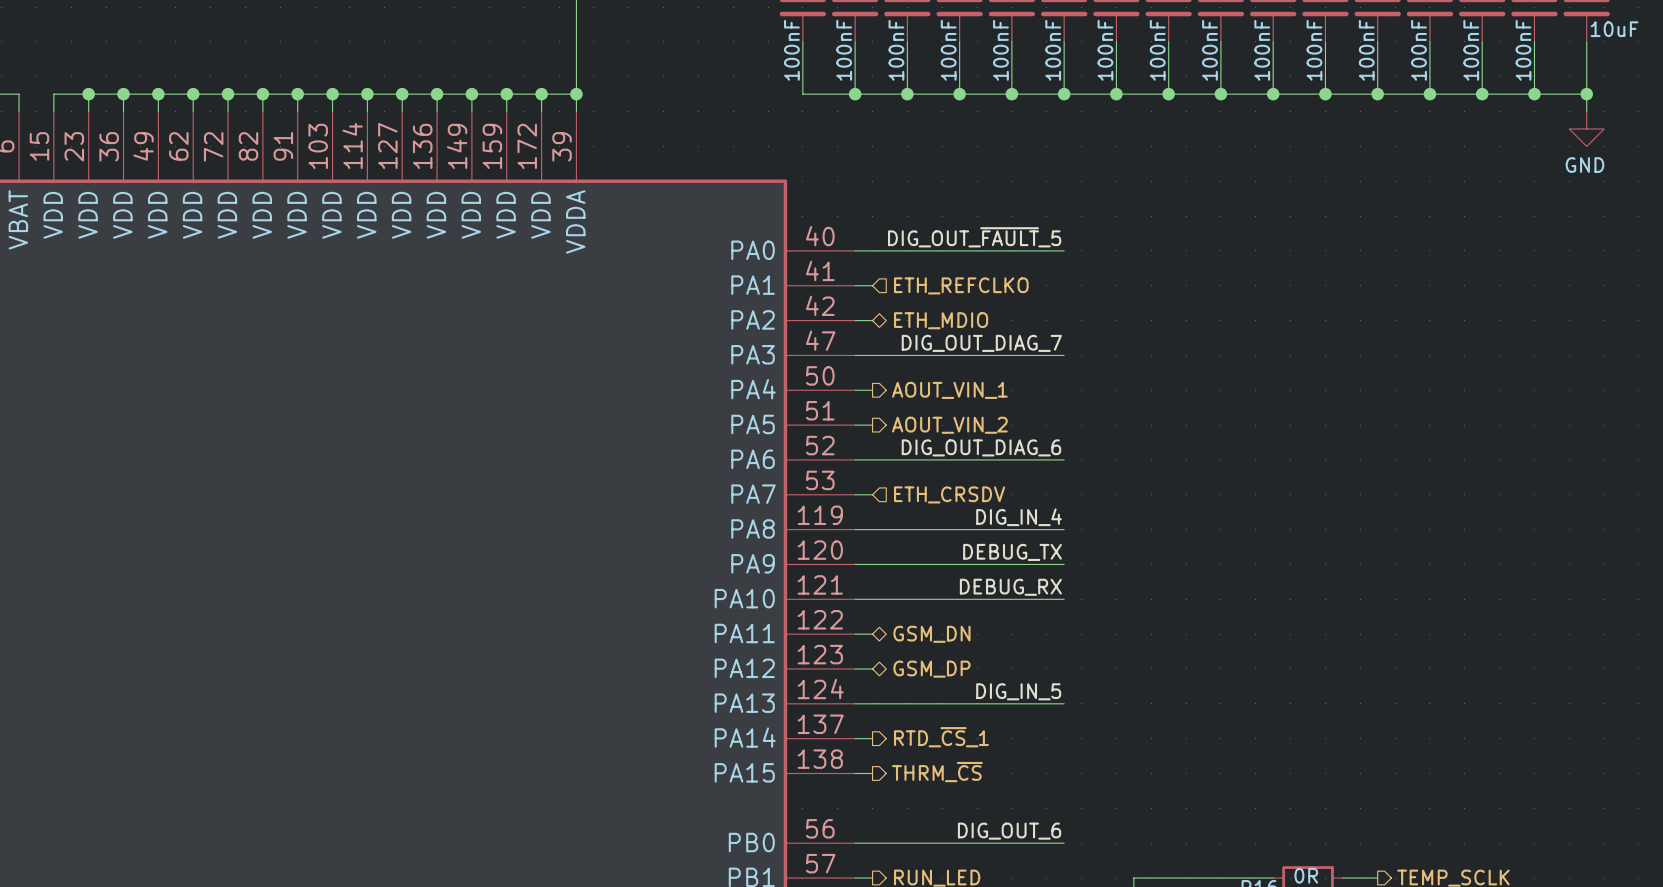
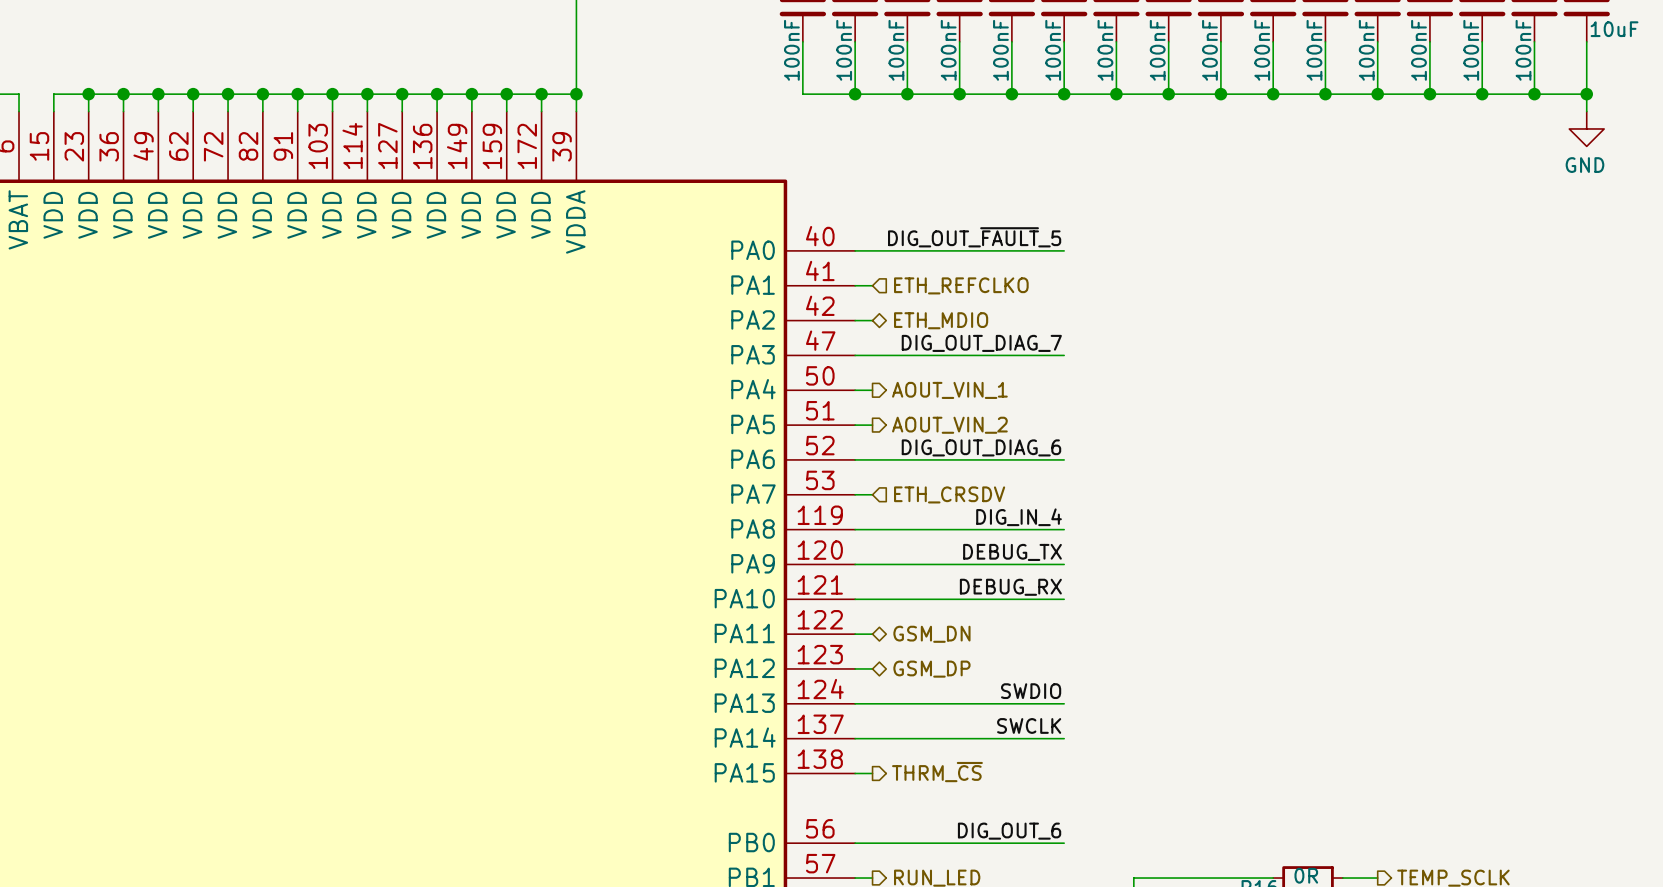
label: DIG_IN_5 (1018, 691) -> SWDIO (1031, 691)
label: none -> SWCLK (1029, 725)
hierarchical label: RTD_~{CS}_1 (941, 737) -> none
wire: none -> (872, 738) (1064, 738)

